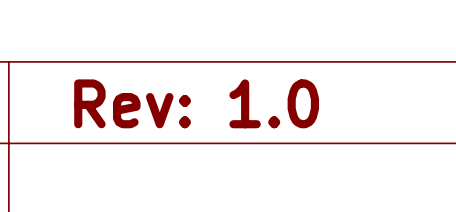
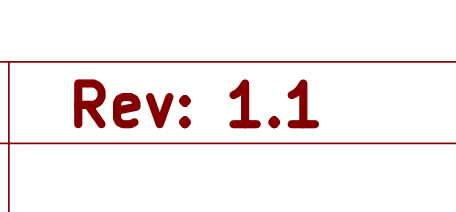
title block: Rev: 1.0 (196, 103) -> Rev: 1.1 (196, 103)

